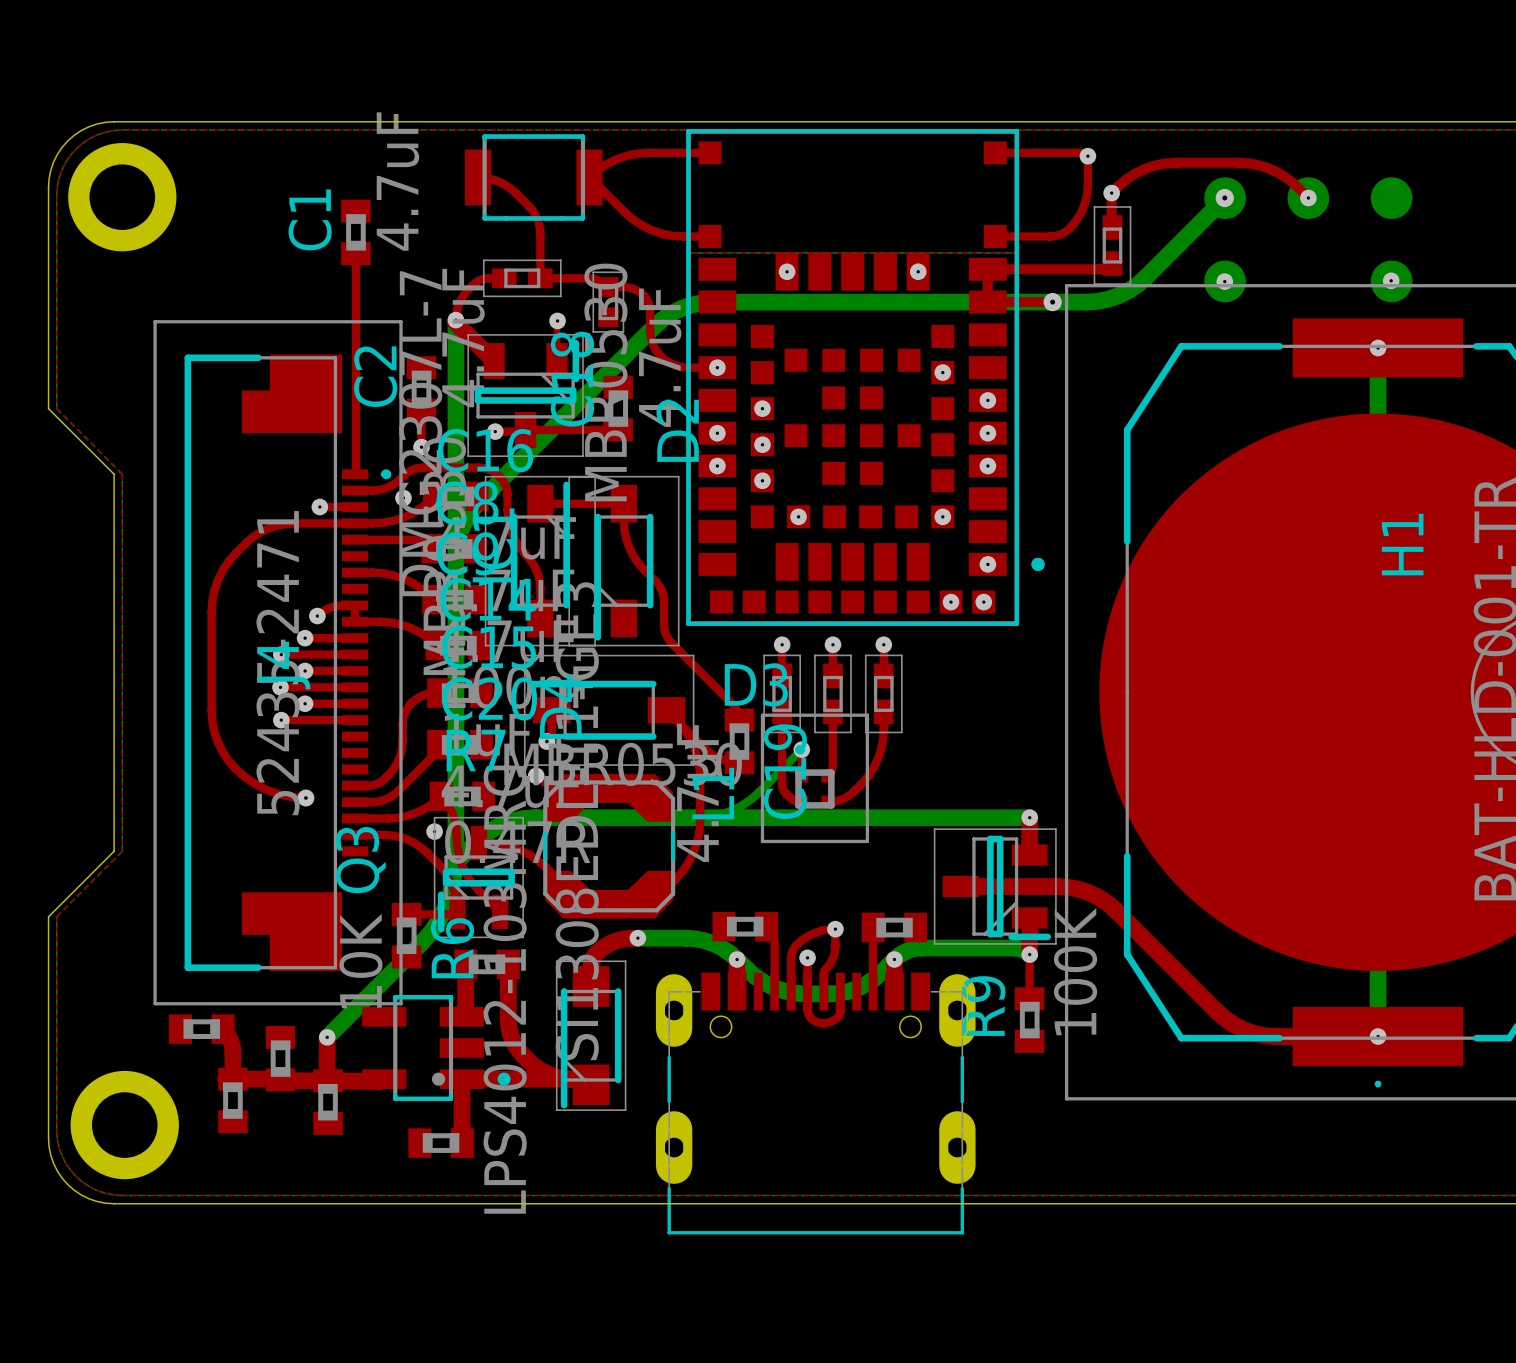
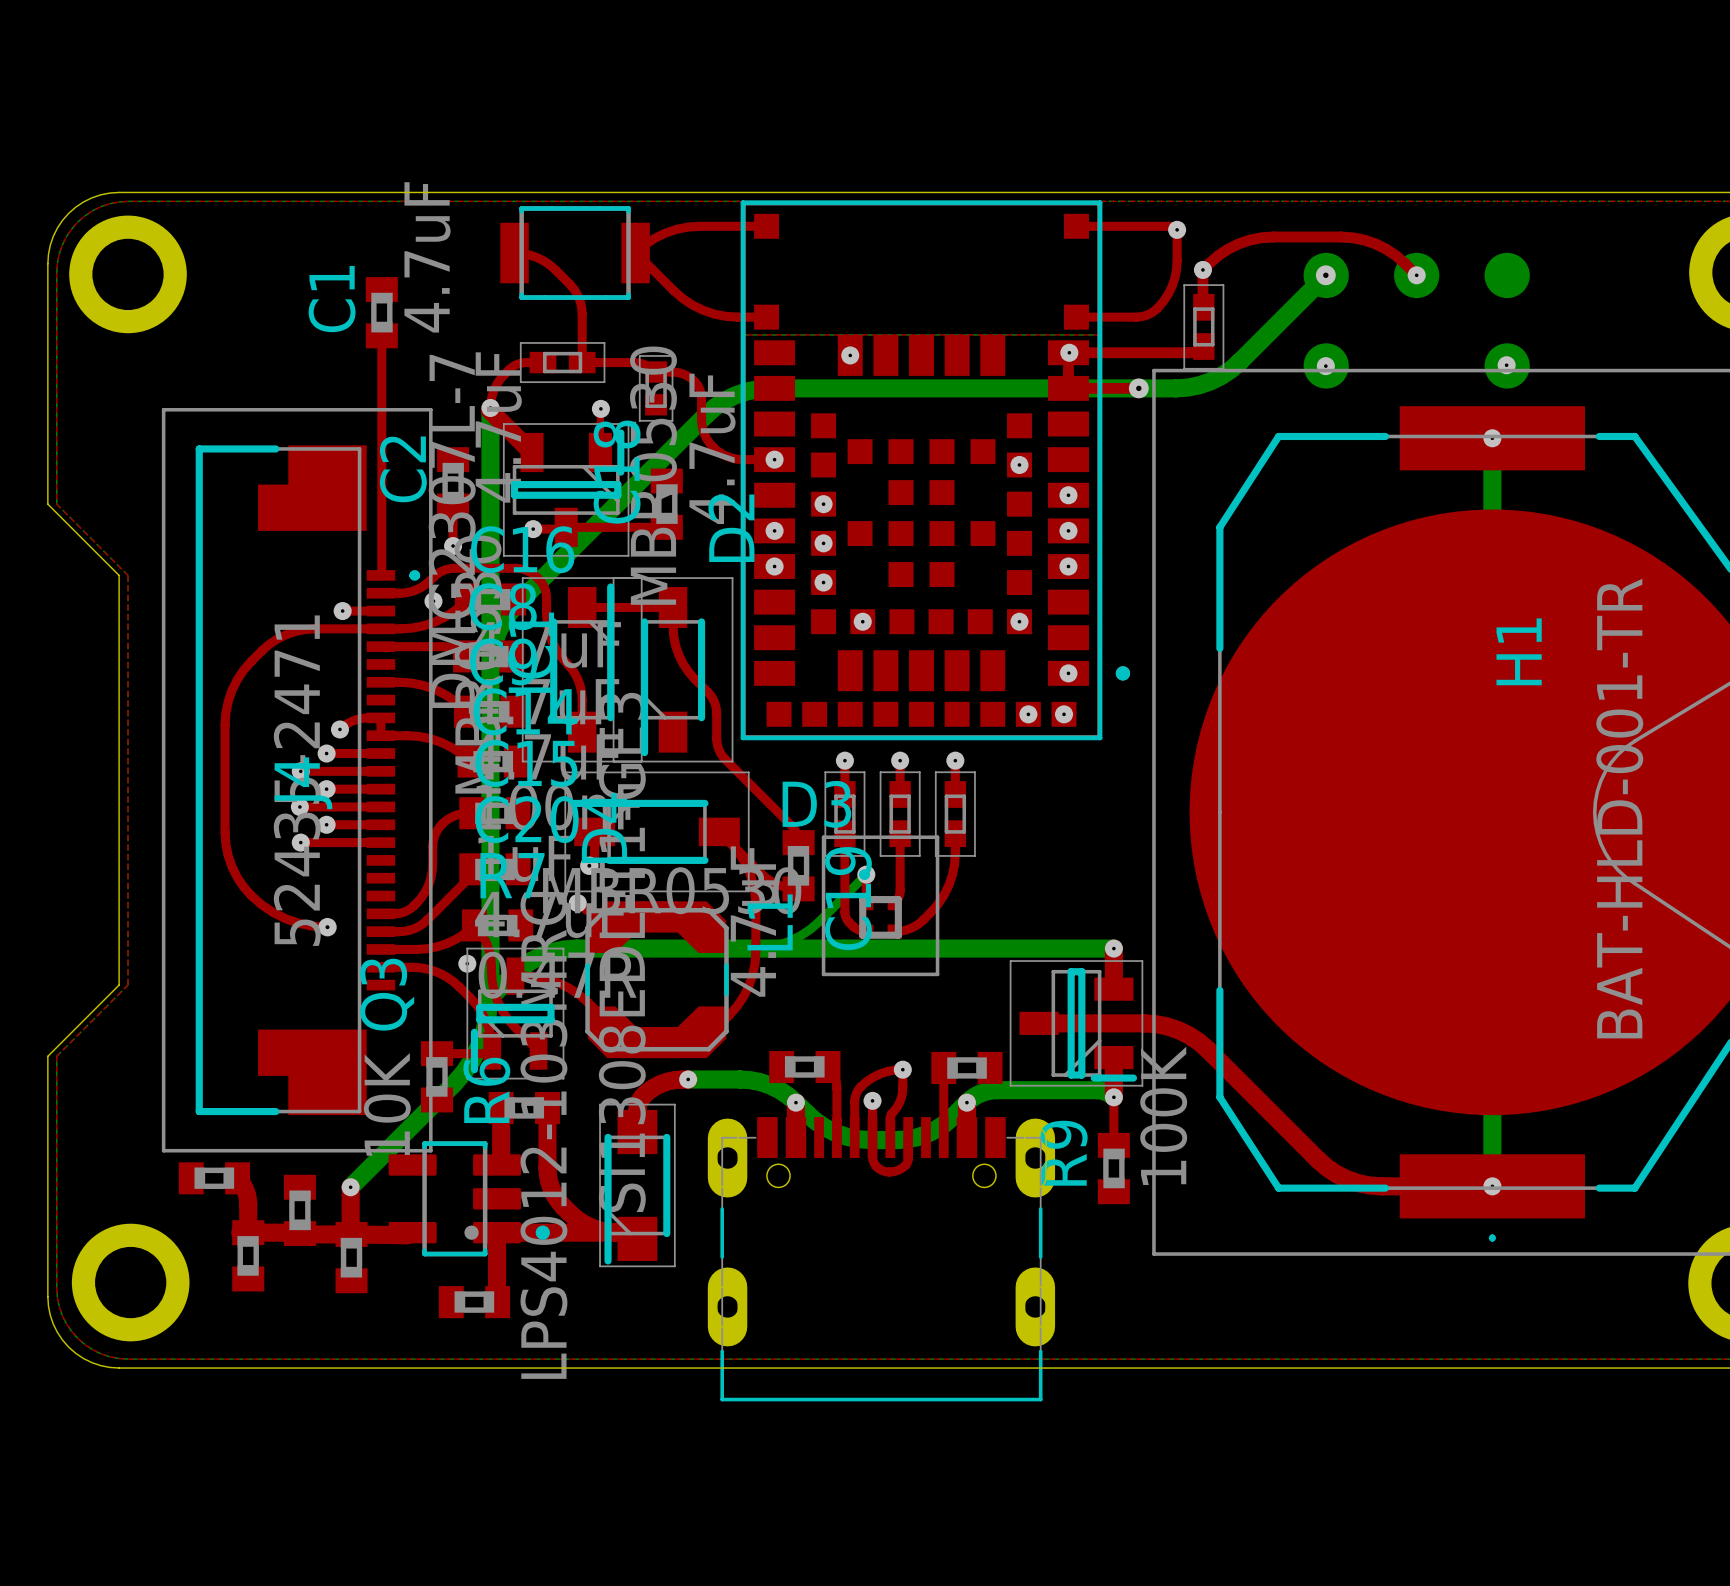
via position: (918, 271) -> (1069, 352)

